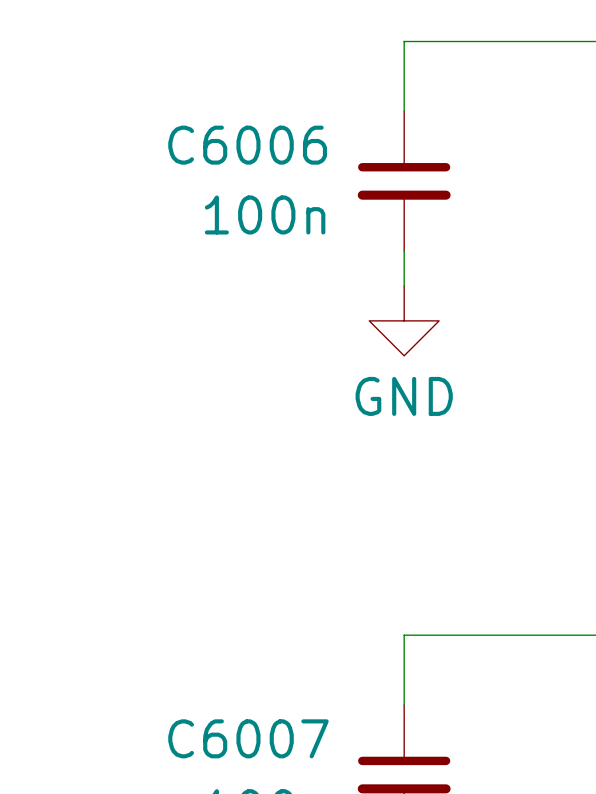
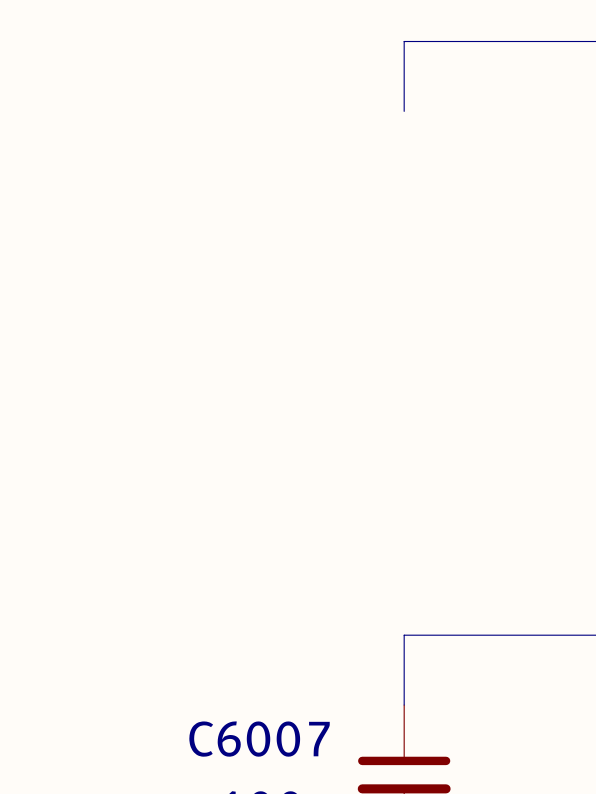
C6006: (404, 181) -> none
wire: (404, 251) (404, 285) -> none
power symbol: GND (404, 320) -> none

